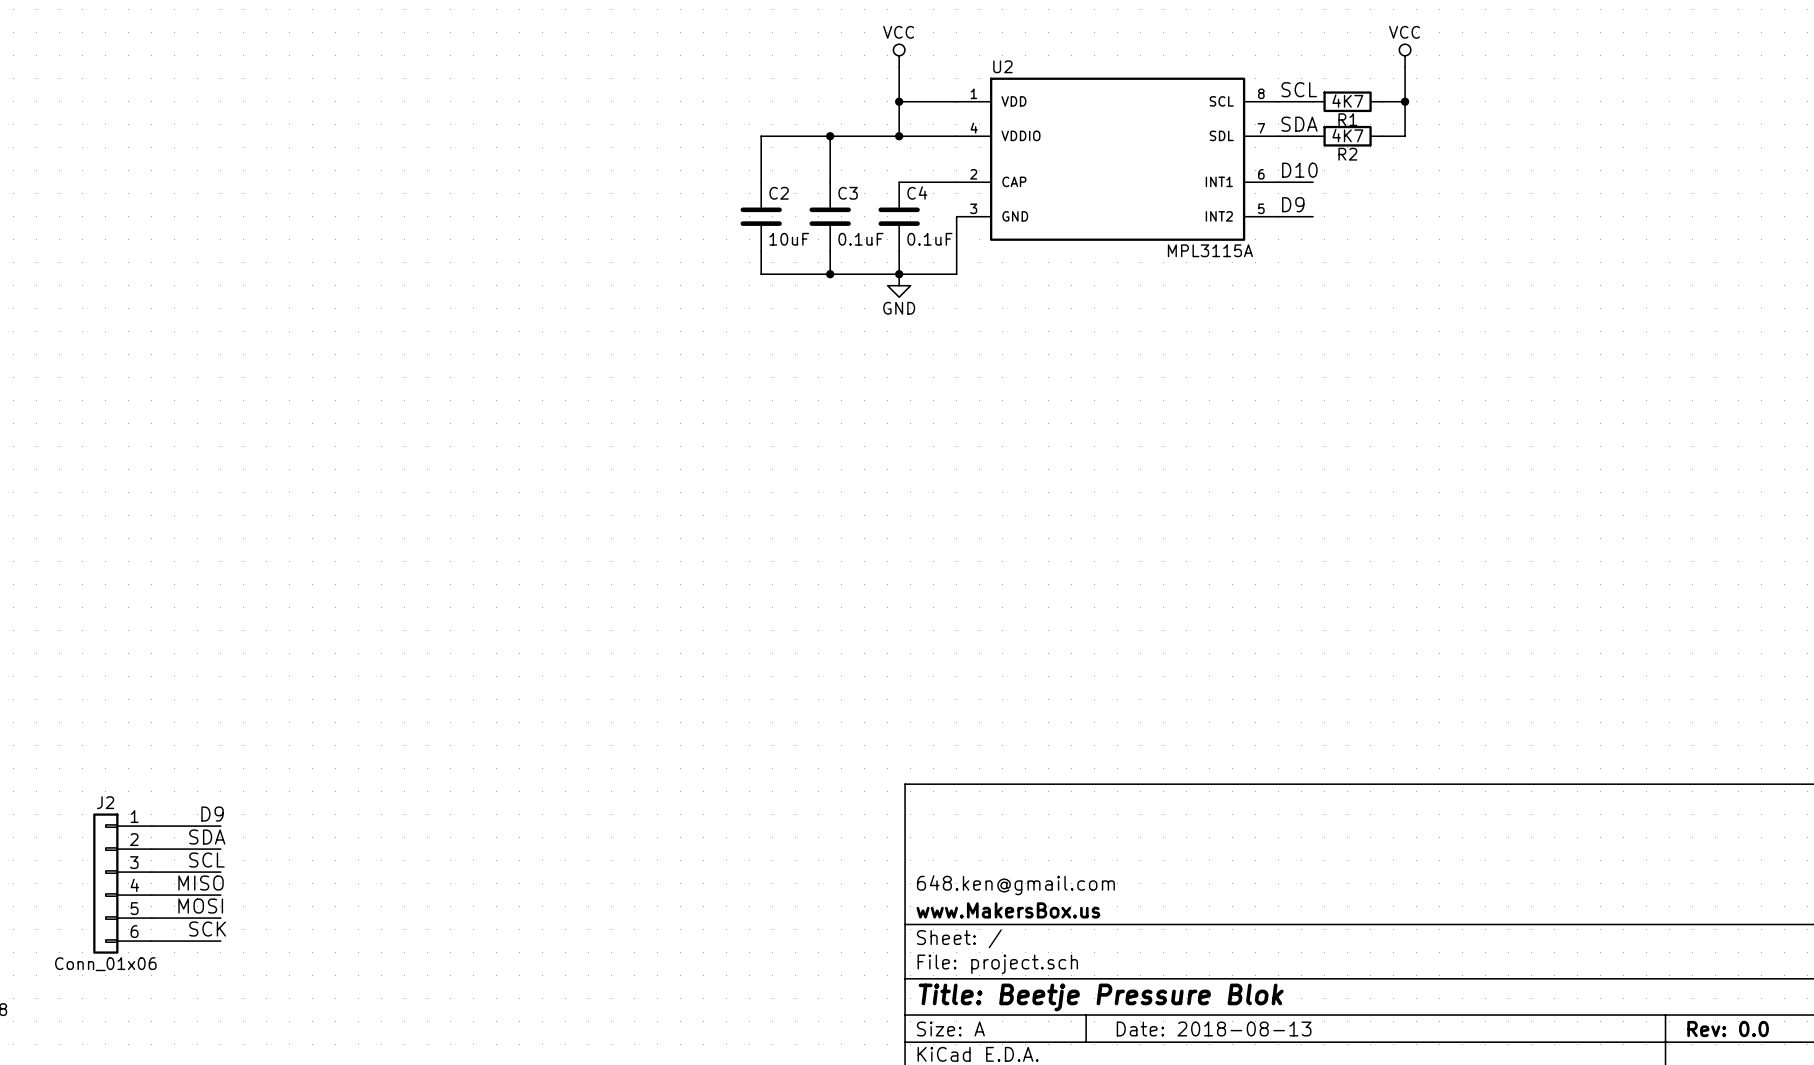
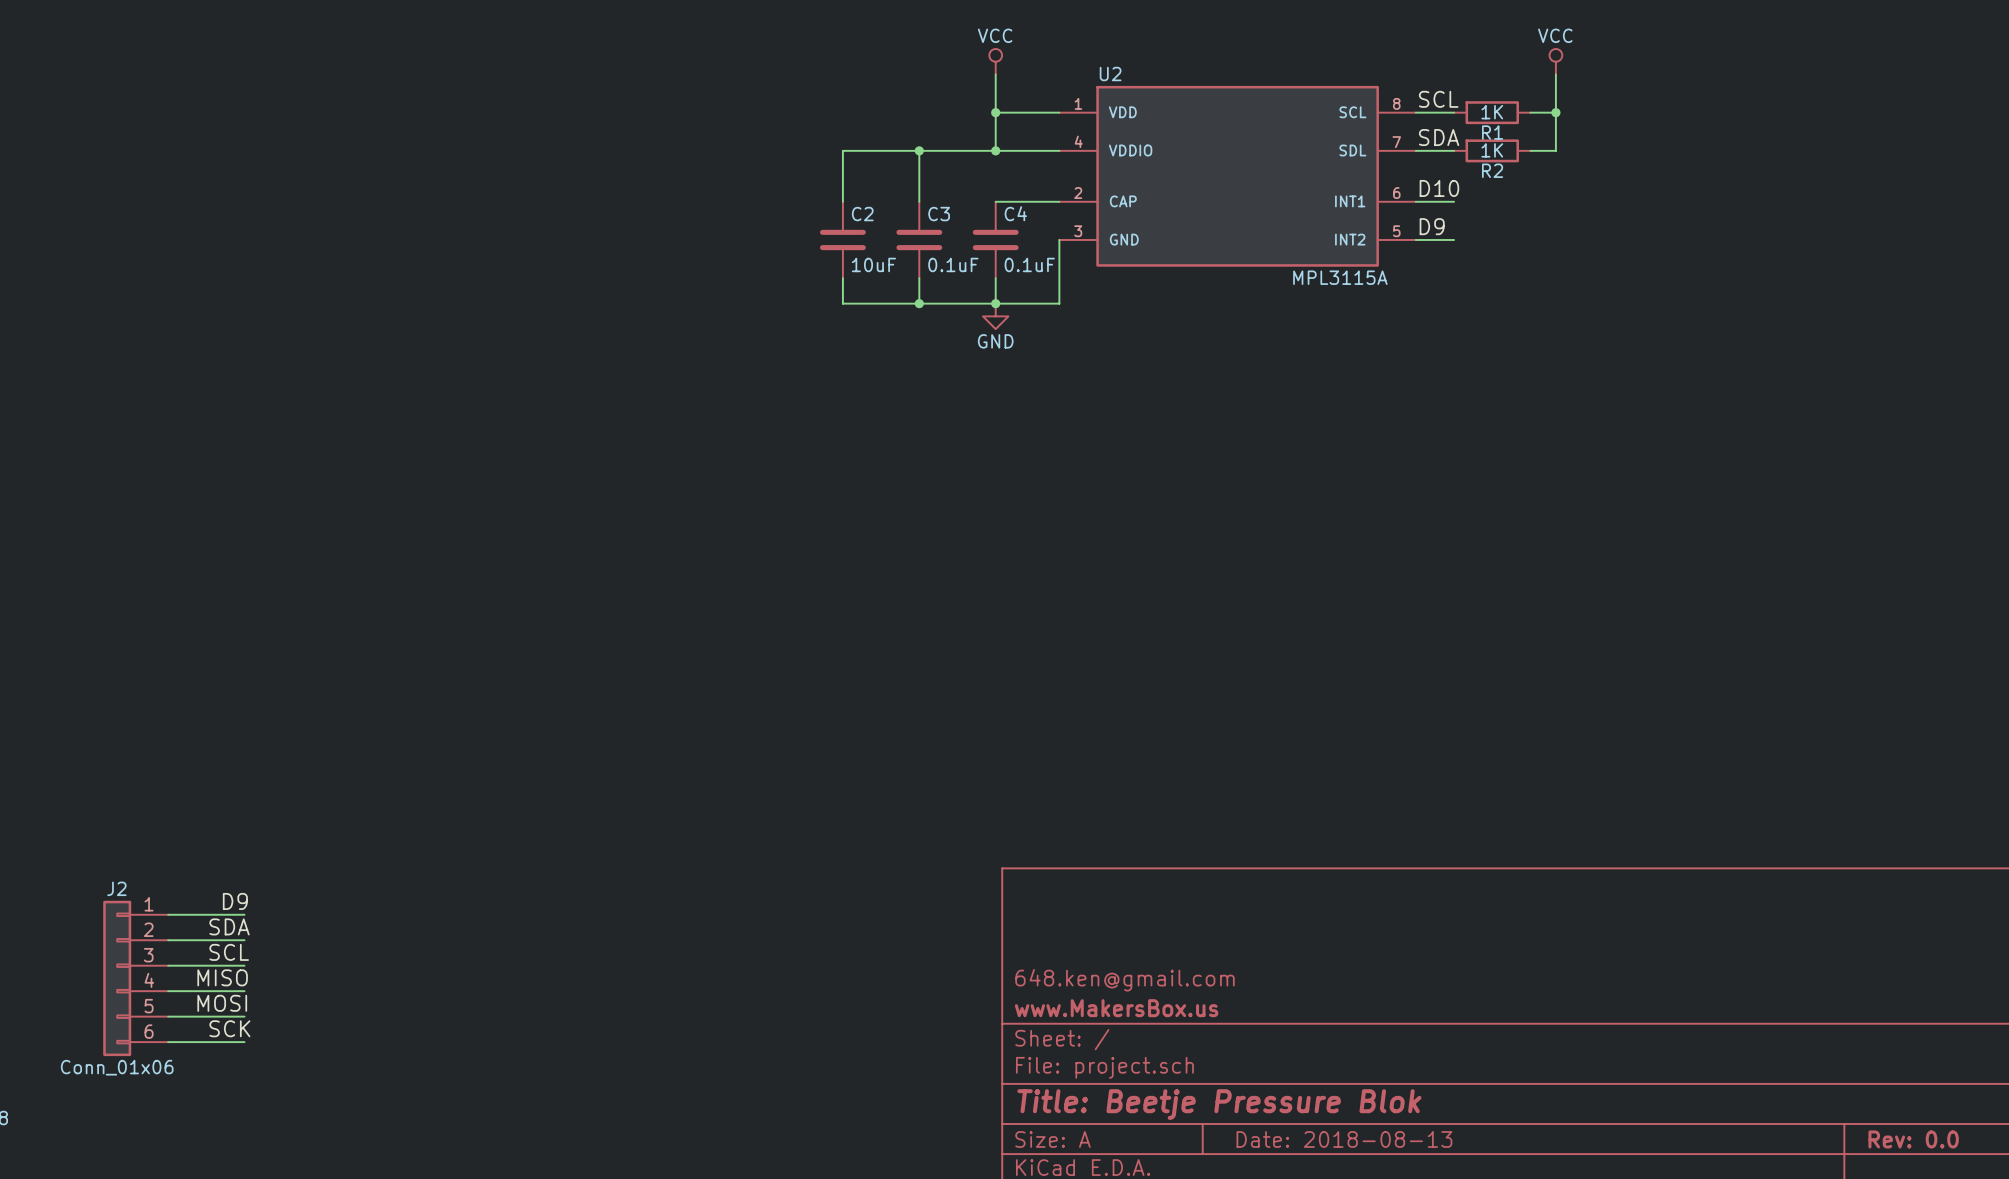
R1 value: 4K7 (1347, 101) -> 1K (1492, 112)
R2 value: 4K7 (1347, 135) -> 1K (1492, 150)

